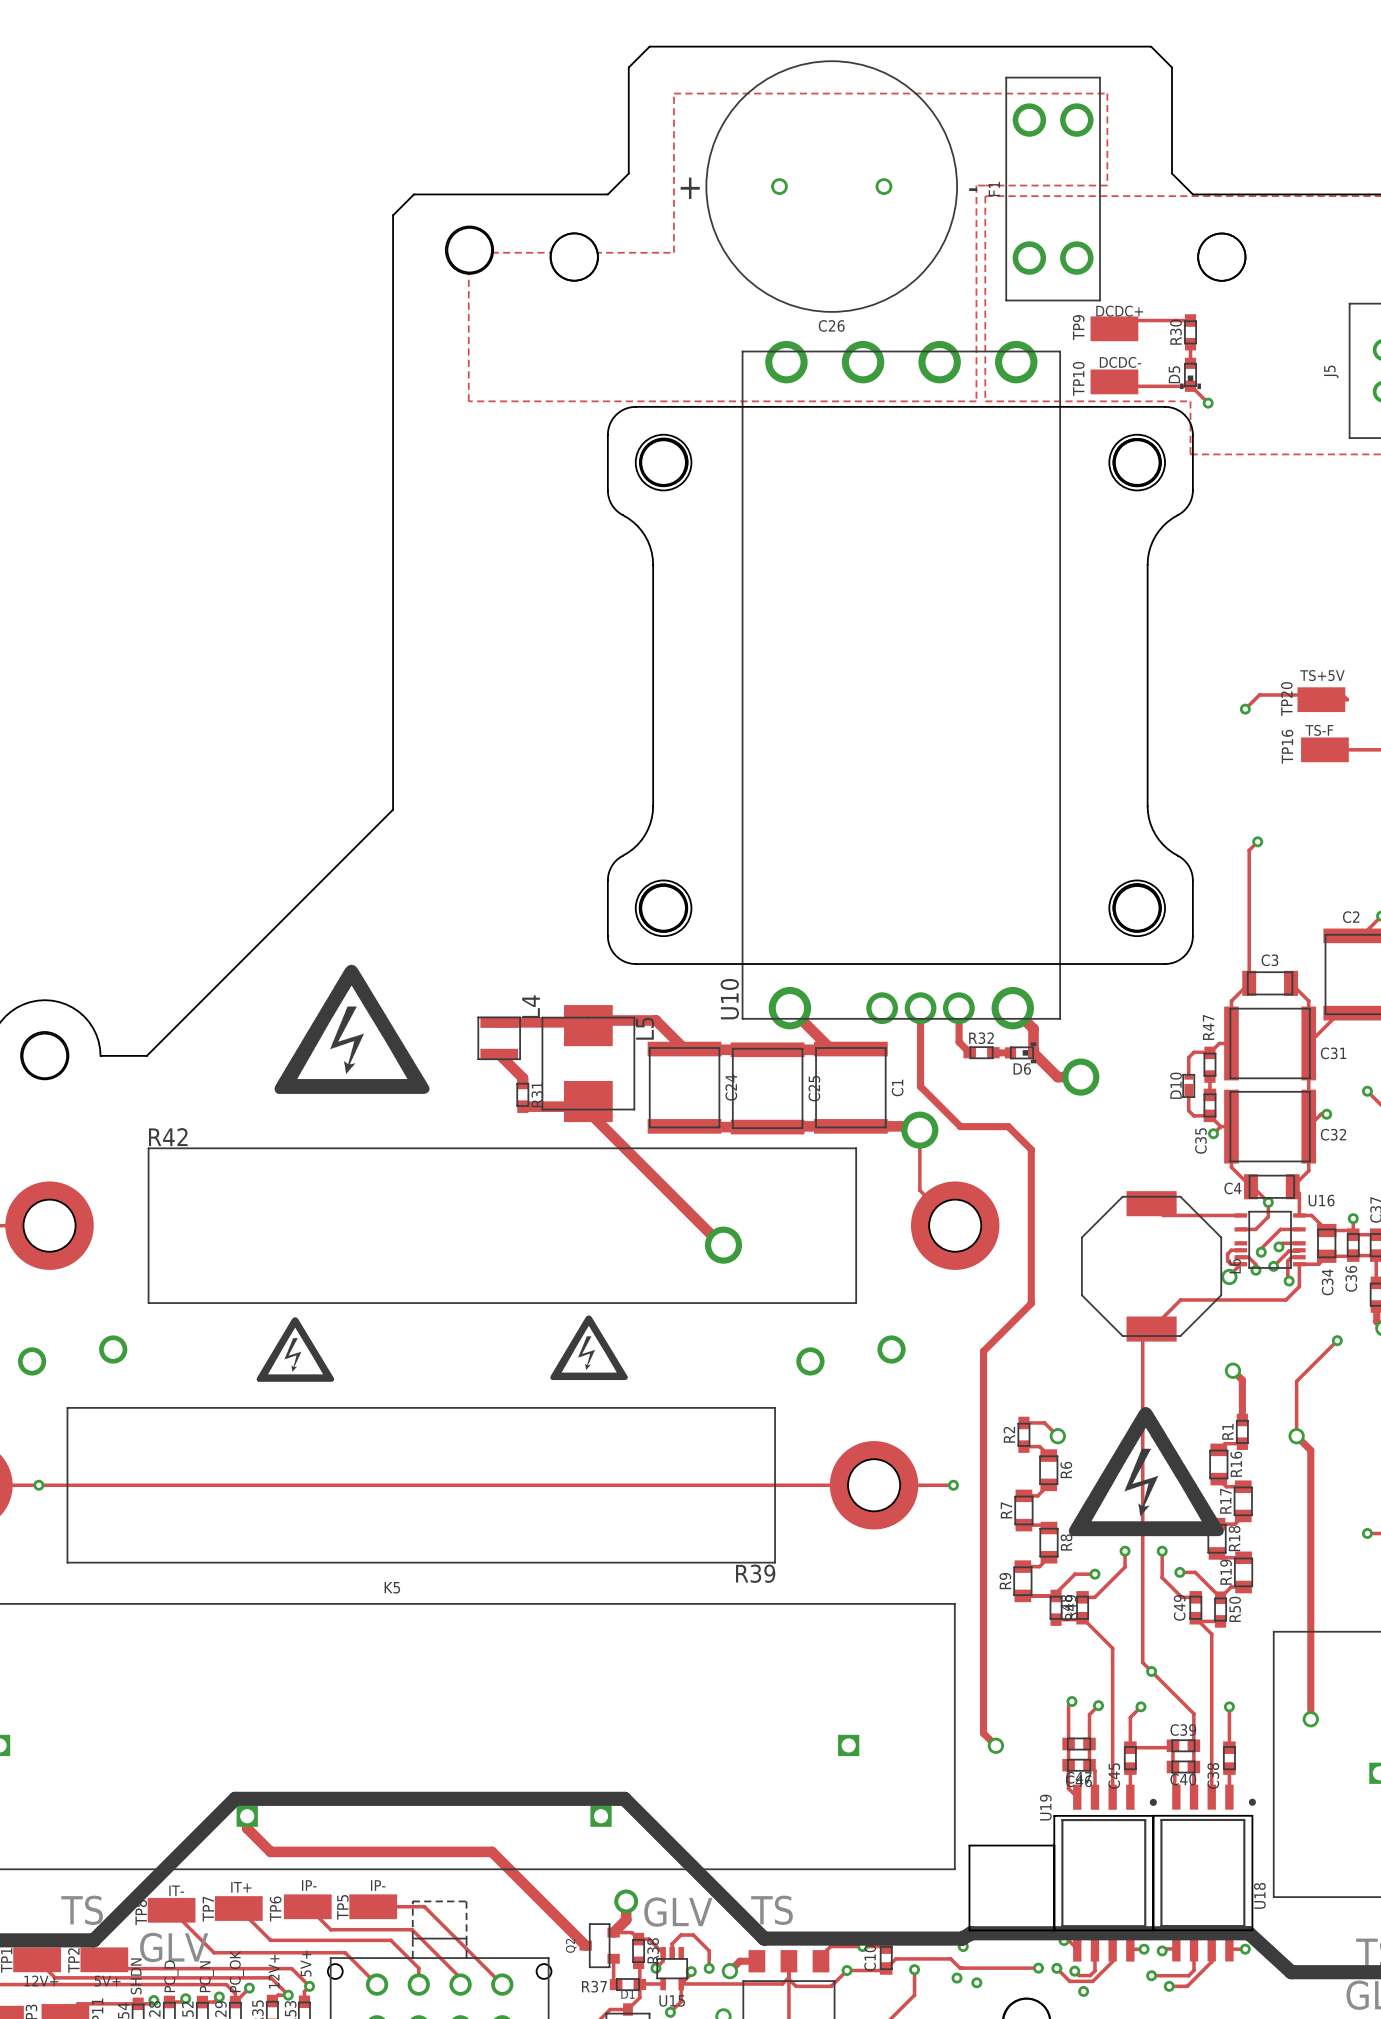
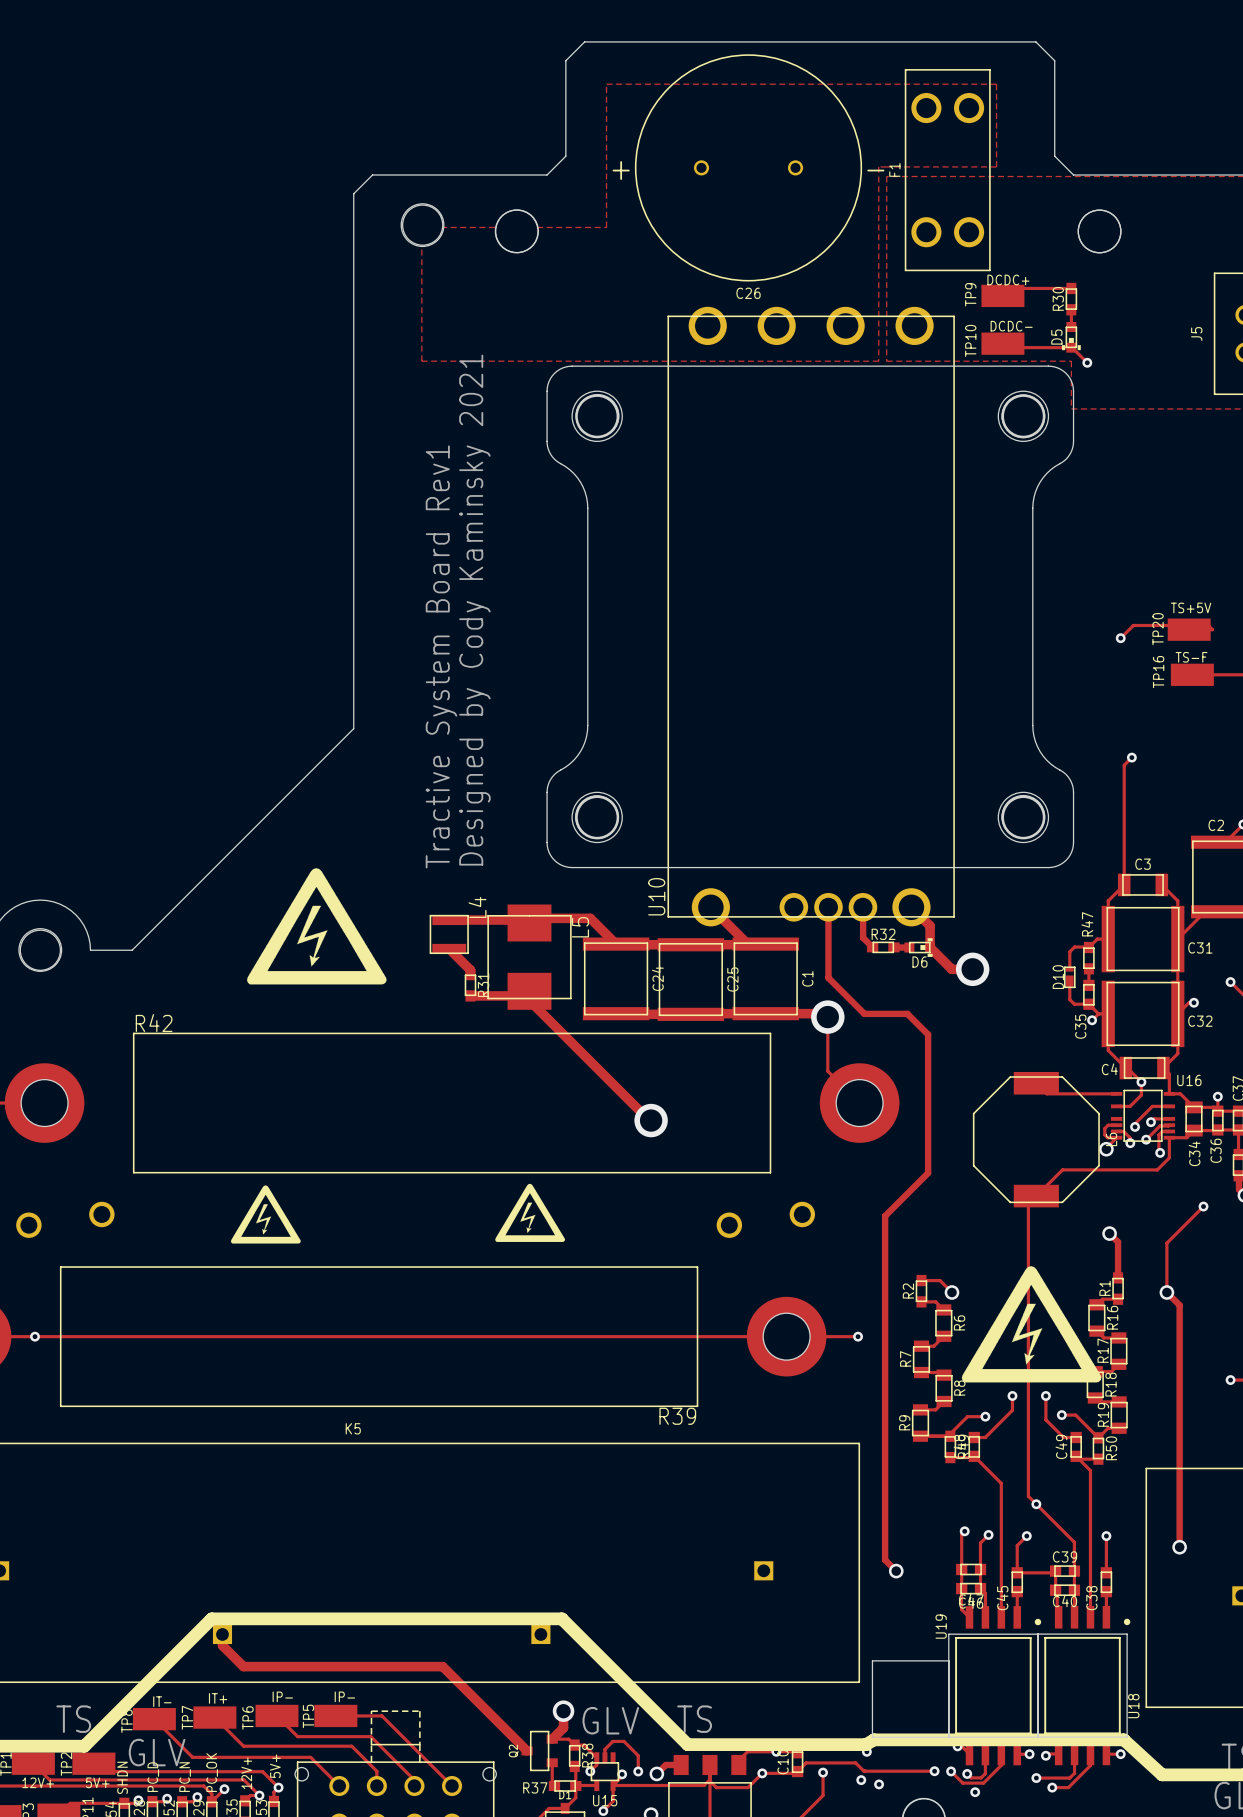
text: none -> Designed by Cody Kaminsky 2021 (474, 610)
text: none -> Tractive System Board Rev1 (441, 656)

